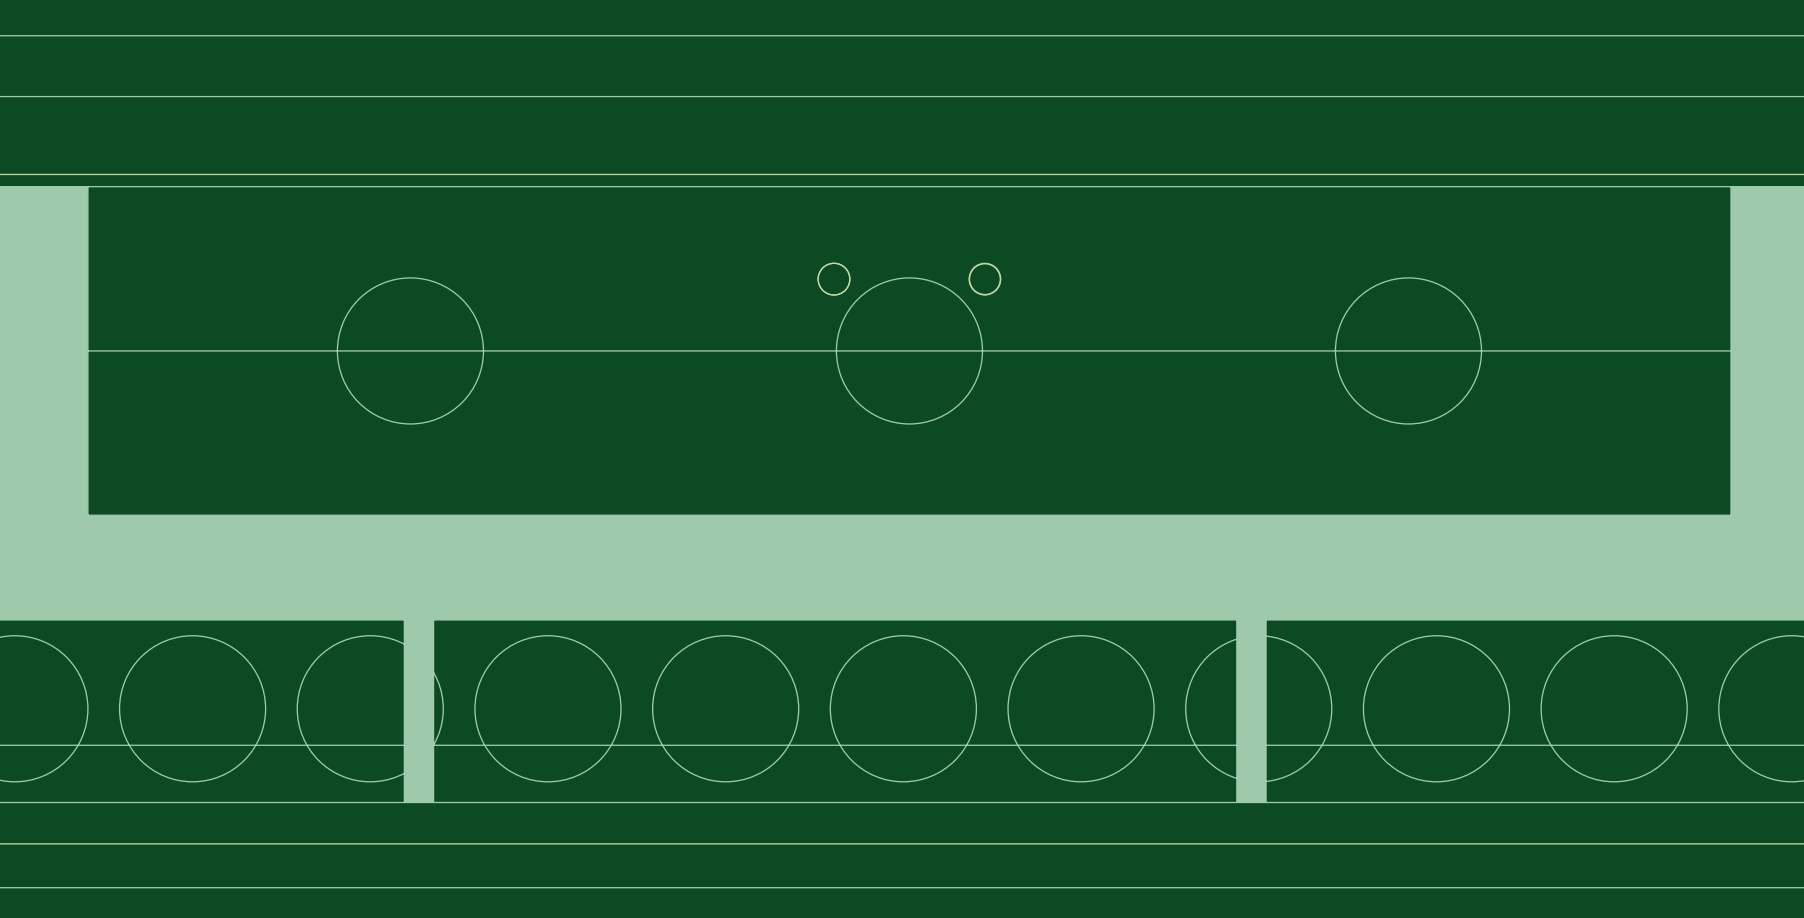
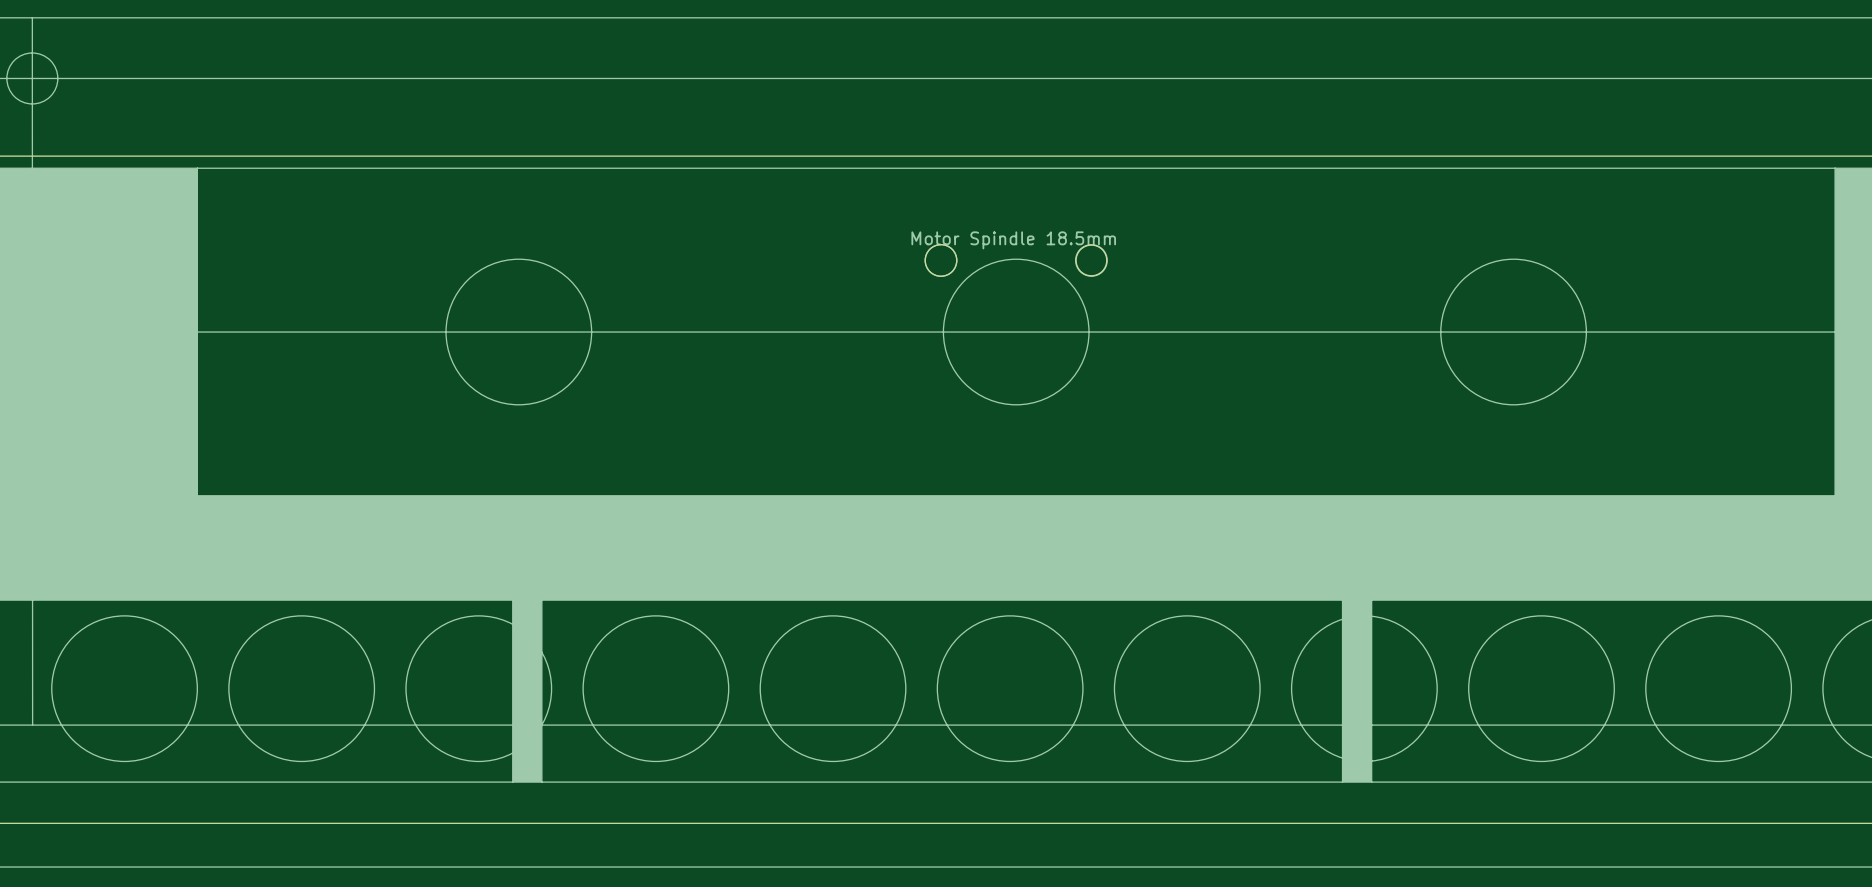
text: none -> Motor Spindle 18.5mm (1013, 240)

